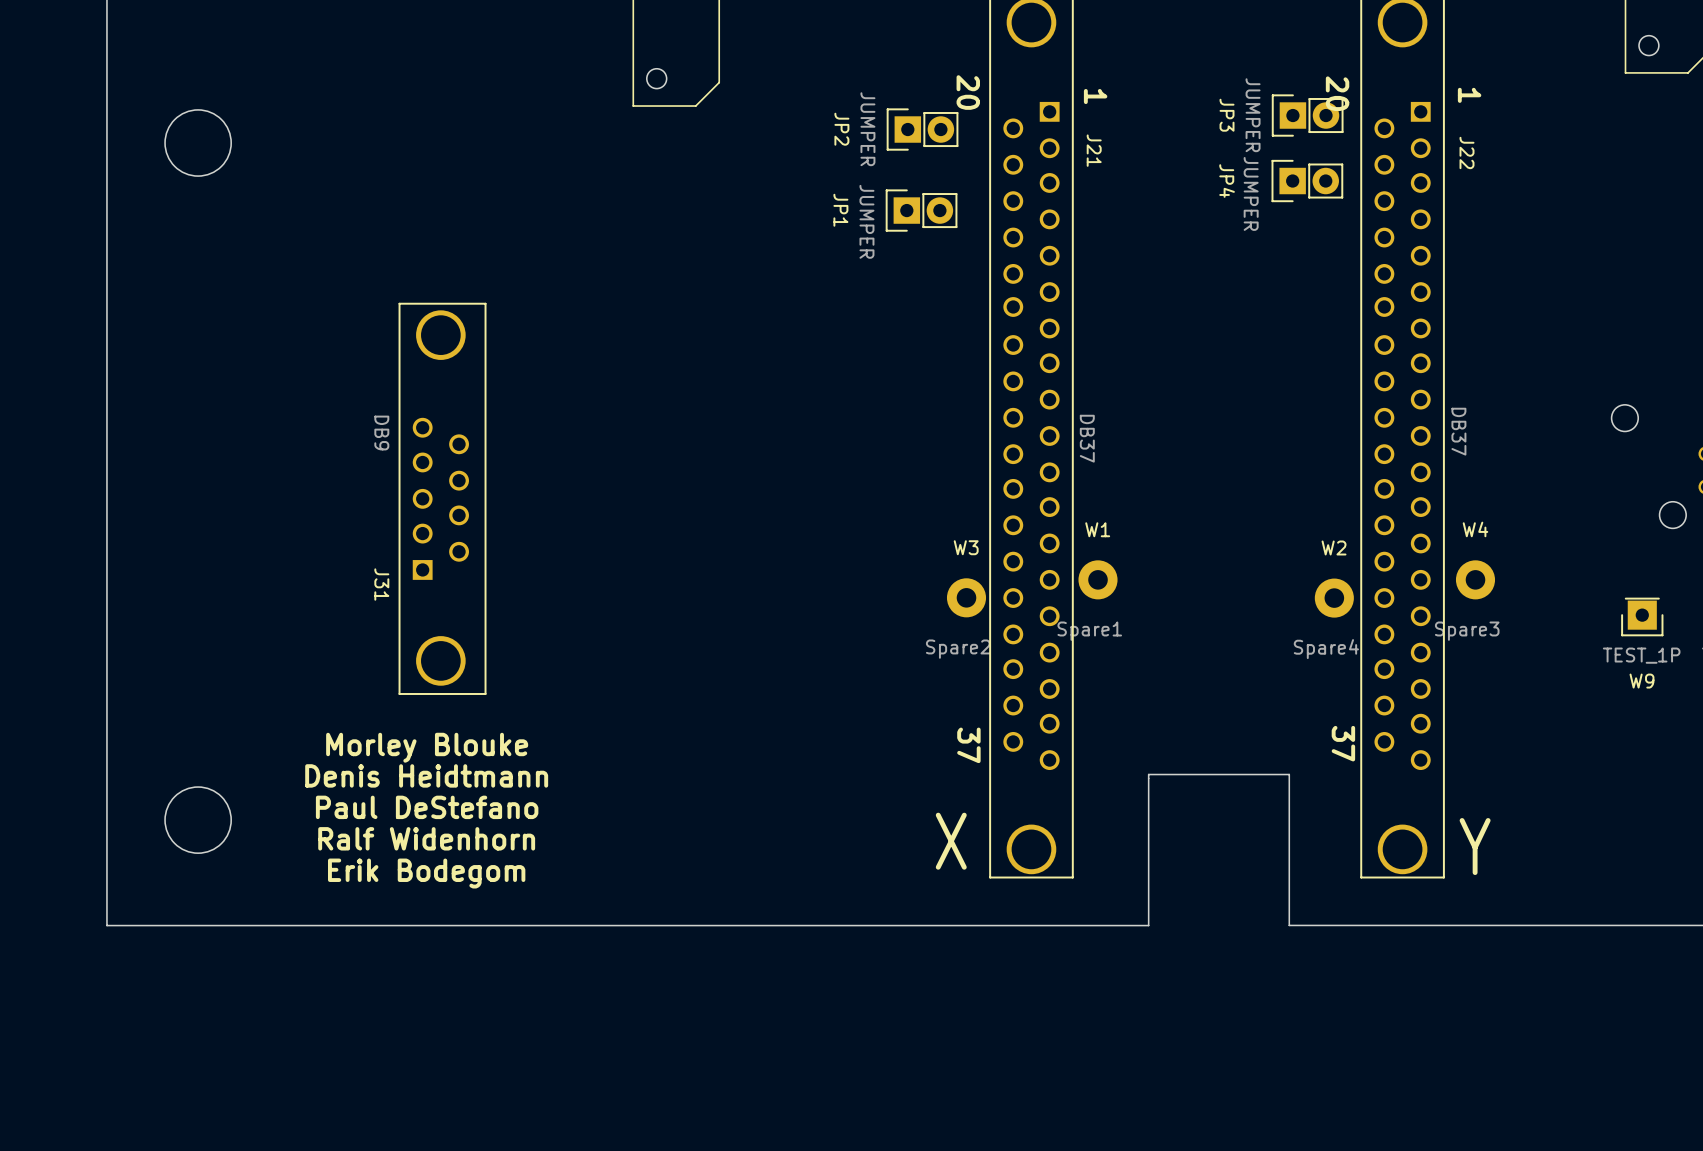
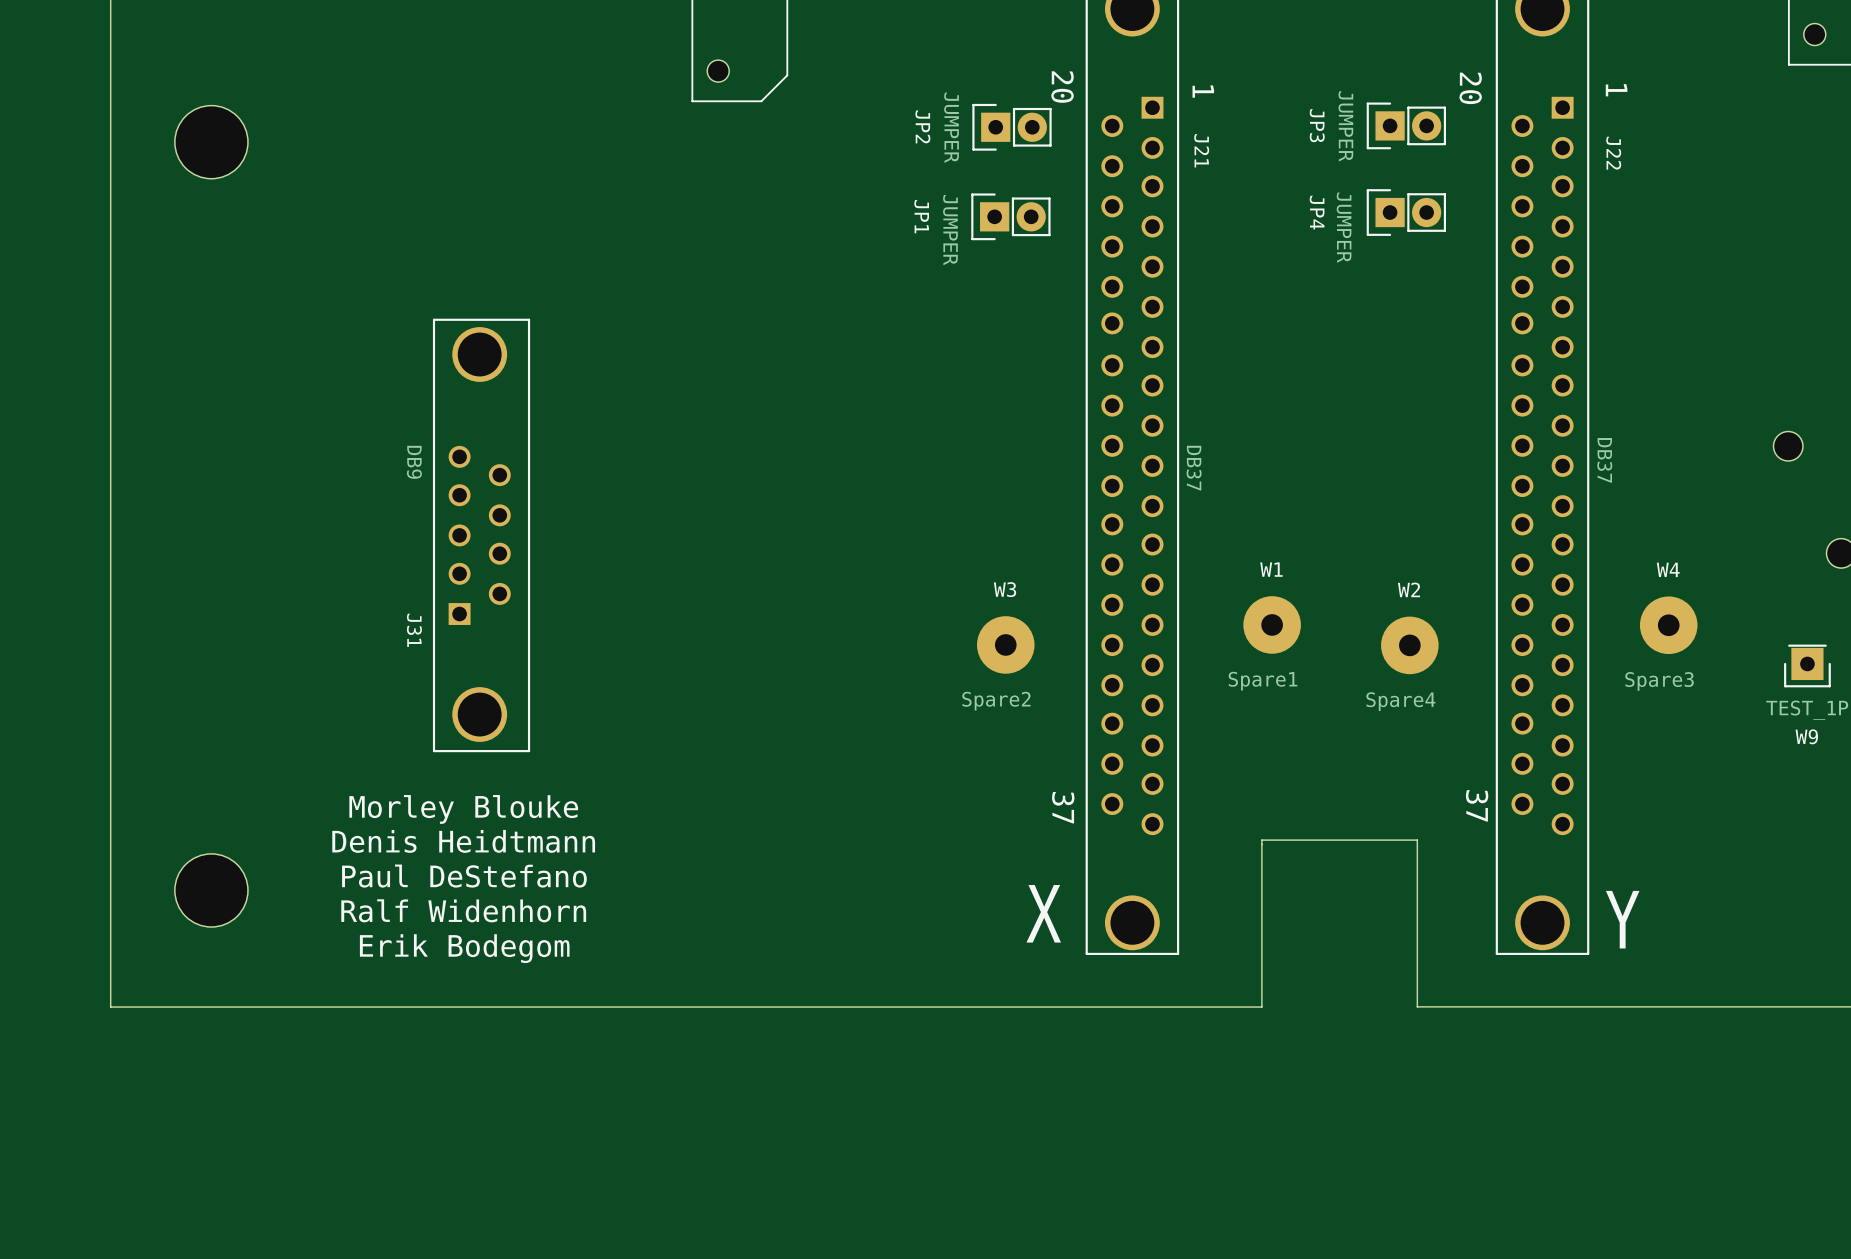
JP3 position: (1307, 115) -> (1406, 125)
JP4 position: (1307, 181) -> (1406, 212)
W1 footprint: [1078, 560, 1118, 600] -> [1243, 596, 1301, 654]
W4 footprint: [1455, 560, 1496, 600] -> [1639, 596, 1698, 655]
W3 footprint: [946, 578, 987, 618] -> [976, 616, 1035, 674]
W2 footprint: [1314, 578, 1354, 618] -> [1381, 616, 1439, 675]

